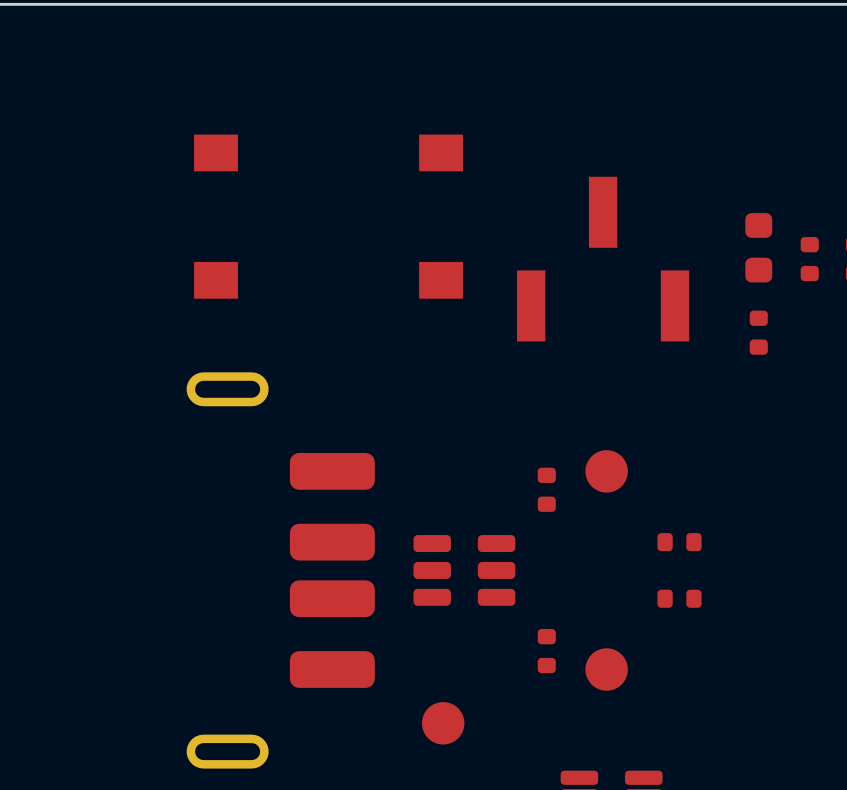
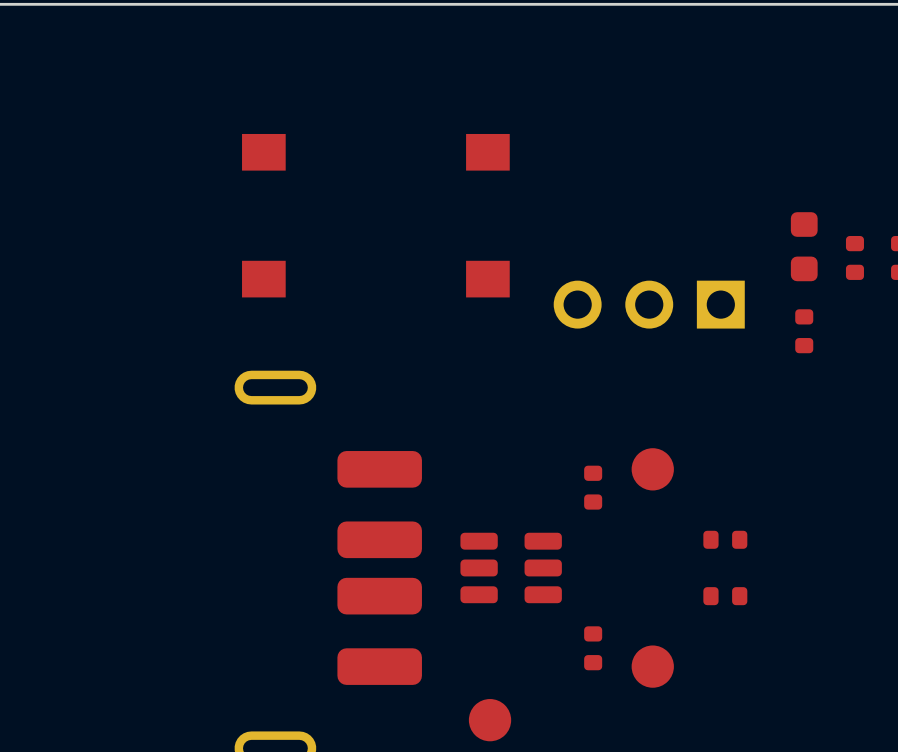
part: (603, 259) -> none
part: none -> (649, 304)

